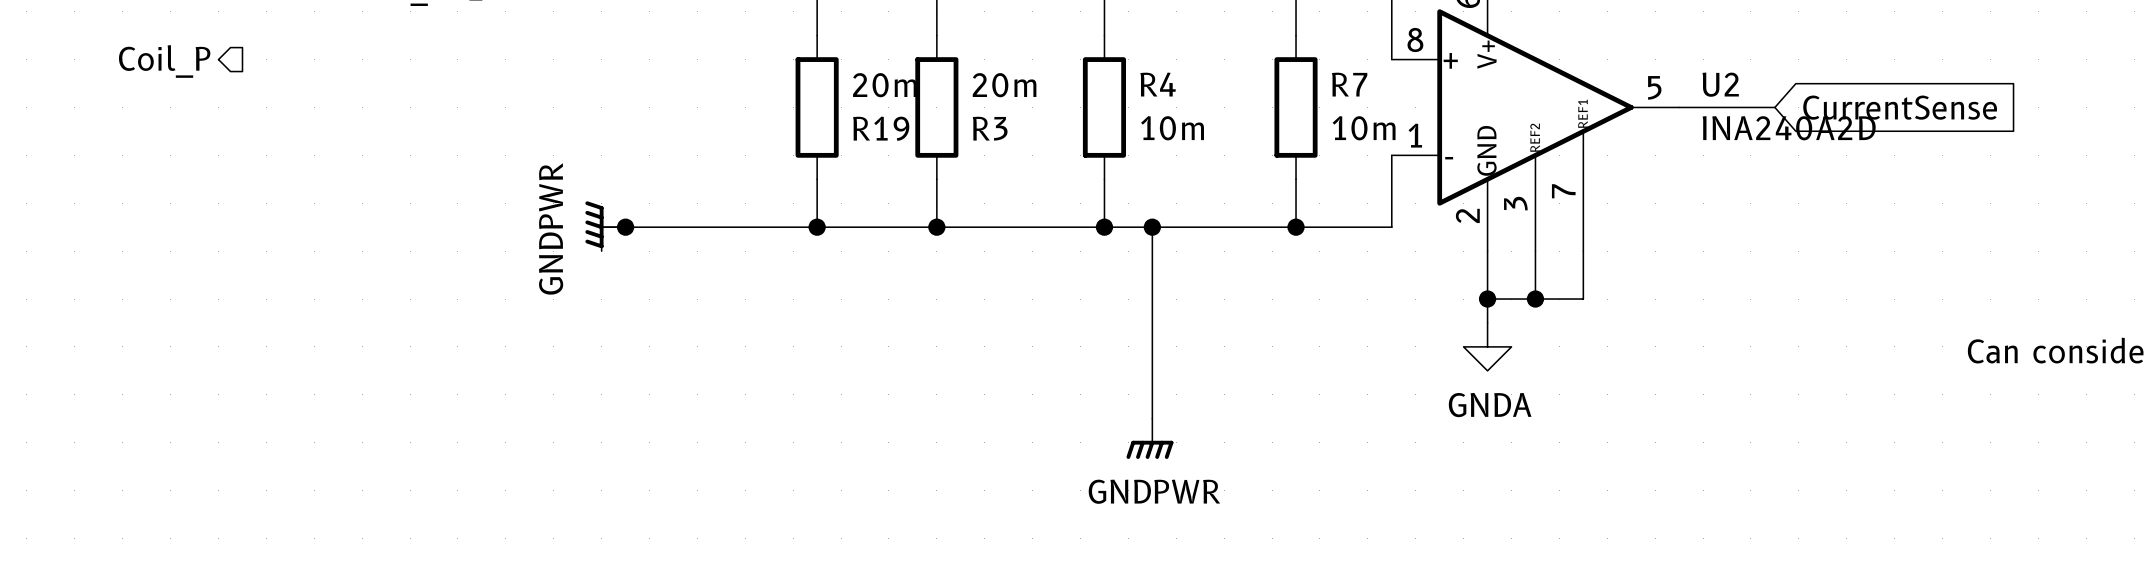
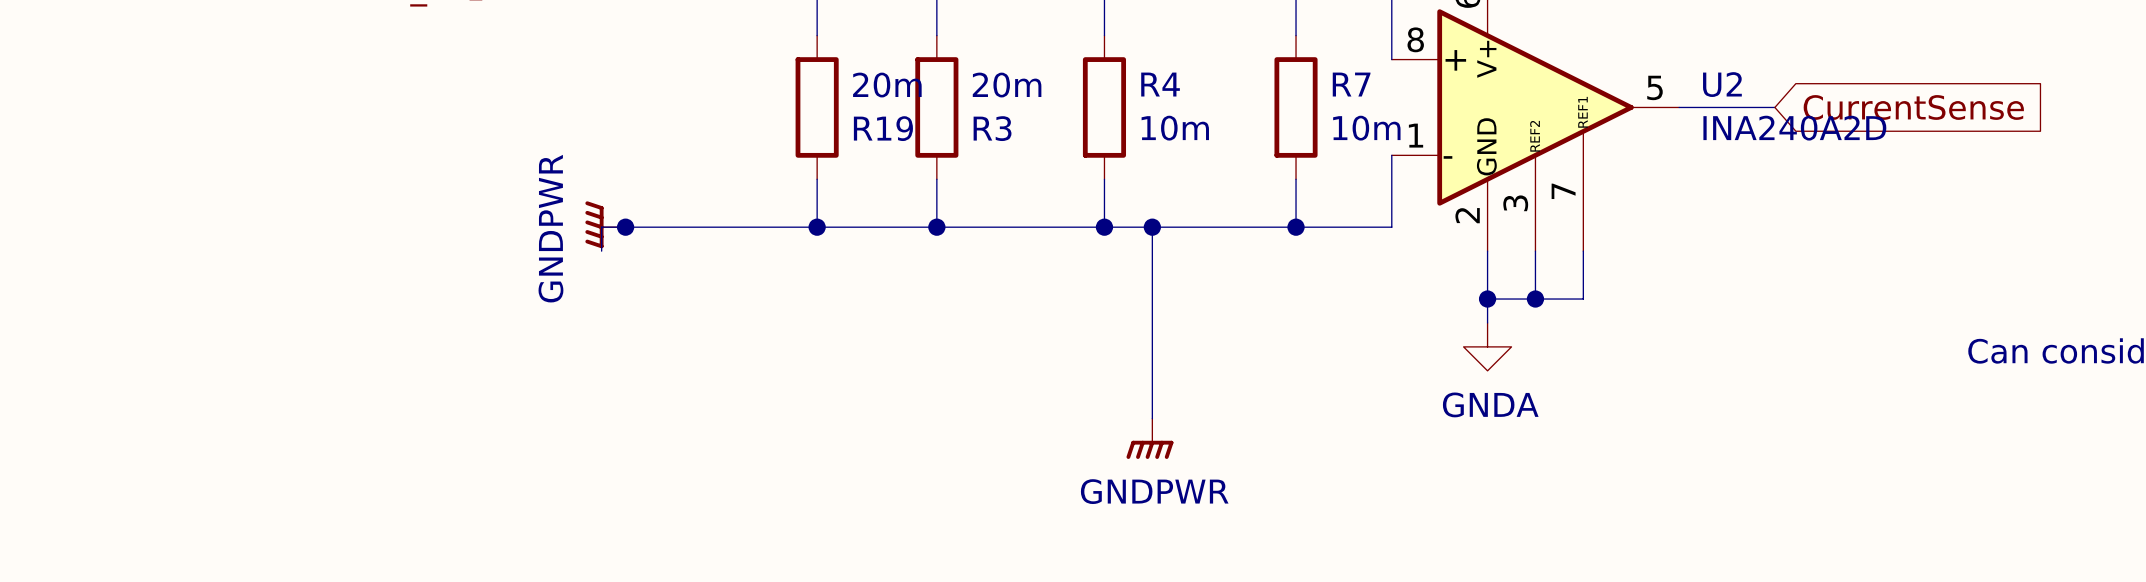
hierarchical label: Coil_P (164, 61) -> none

